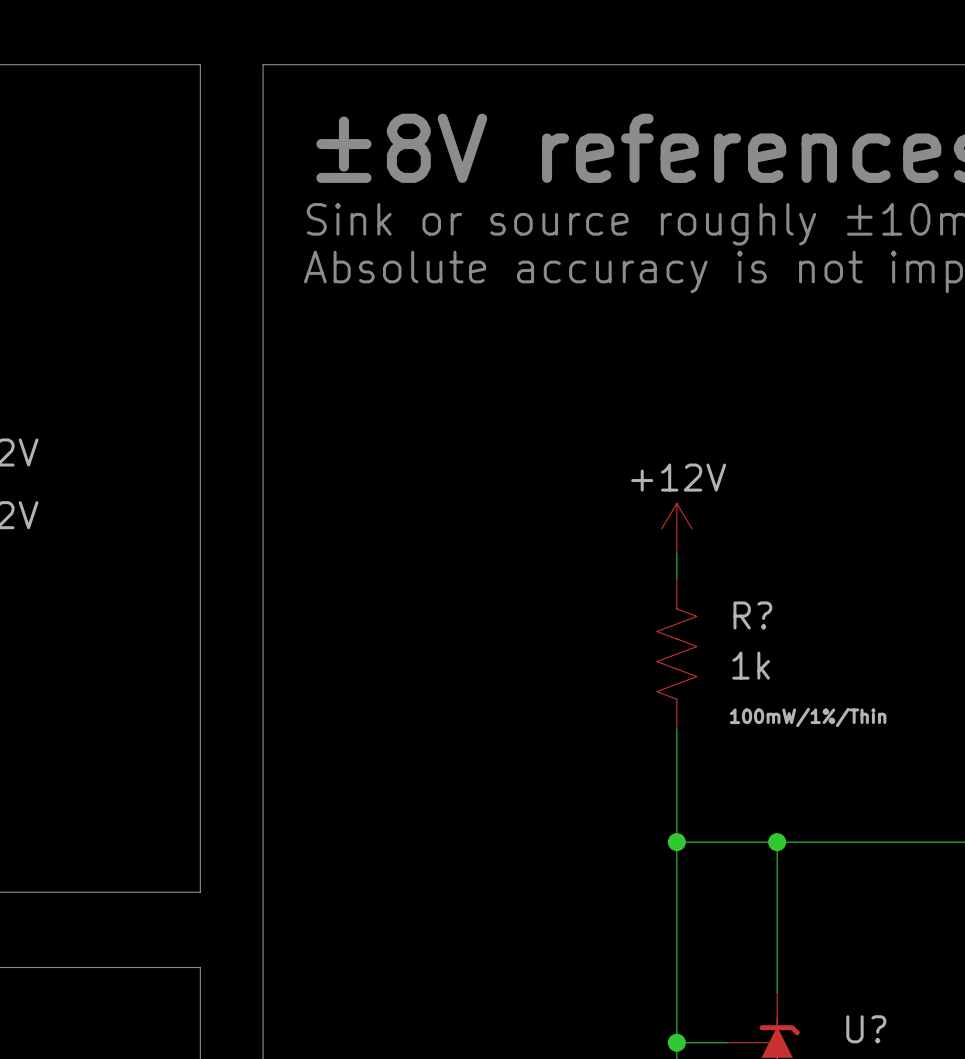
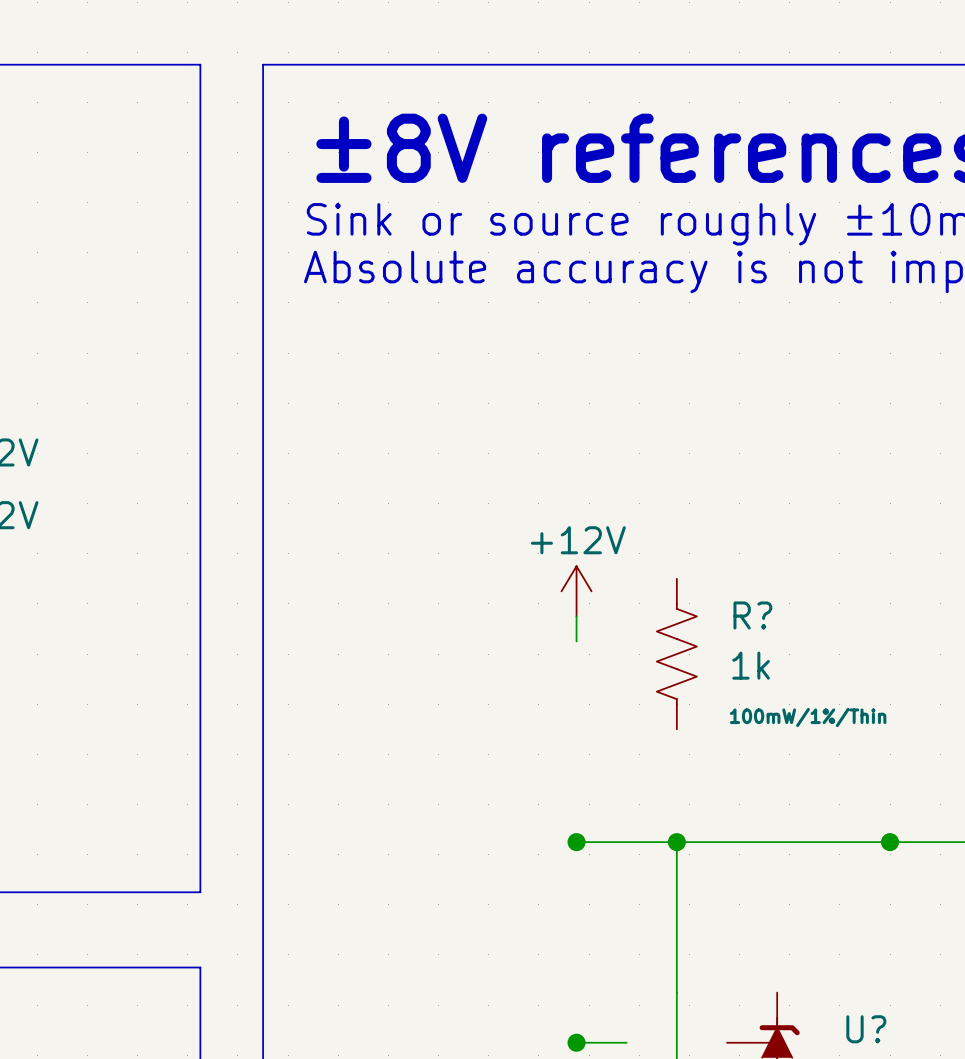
power symbol position: +12V (676, 528) -> +12V (576, 591)
wire: (676, 553) (676, 578) -> (576, 616) (576, 641)
wire: (676, 729) (676, 842) -> (576, 842) (676, 842)
junction: none -> (576, 842)
wire: (777, 842) (777, 992) -> none
junction: (777, 842) -> none
junction: none -> (890, 842)
wire: (676, 1042) (727, 1042) -> (576, 1042) (626, 1042)
junction position: (676, 1042) -> (576, 1042)

